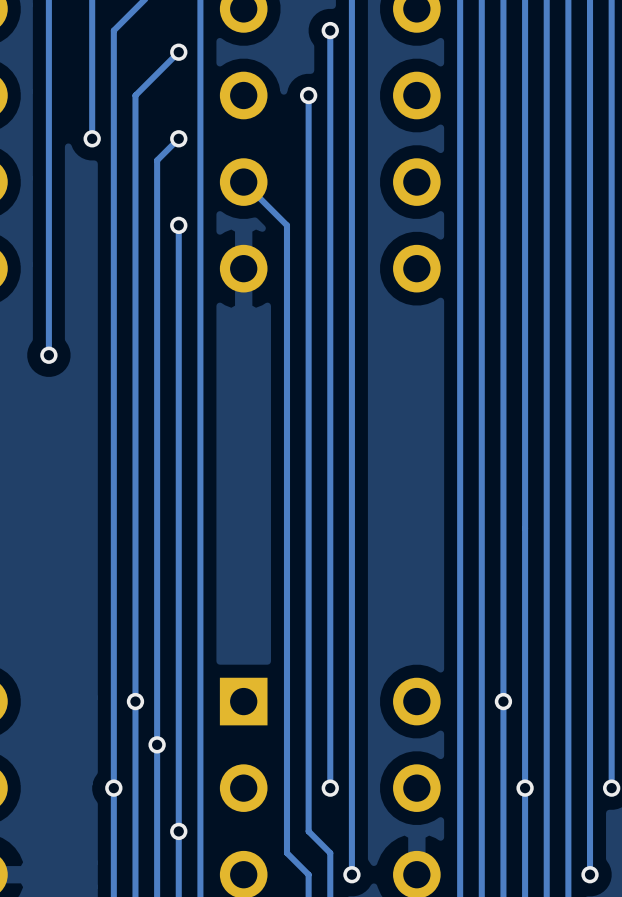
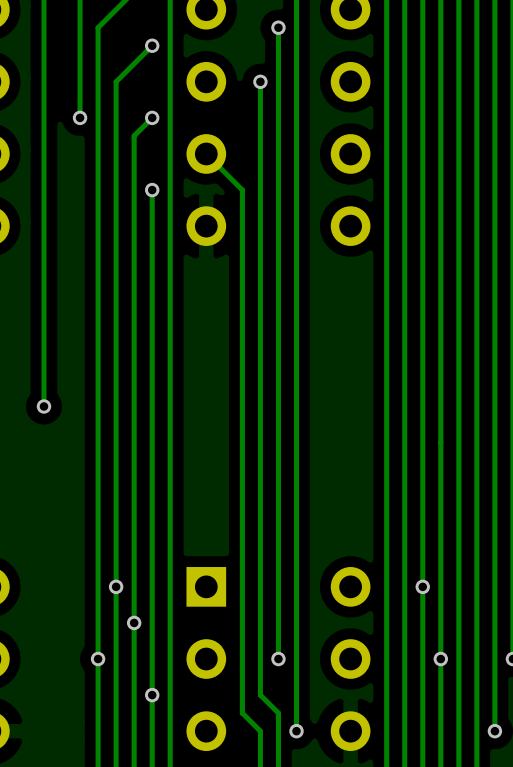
track: none -> (43, 298) (43, 406)
via position: (48, 355) -> (43, 406)

